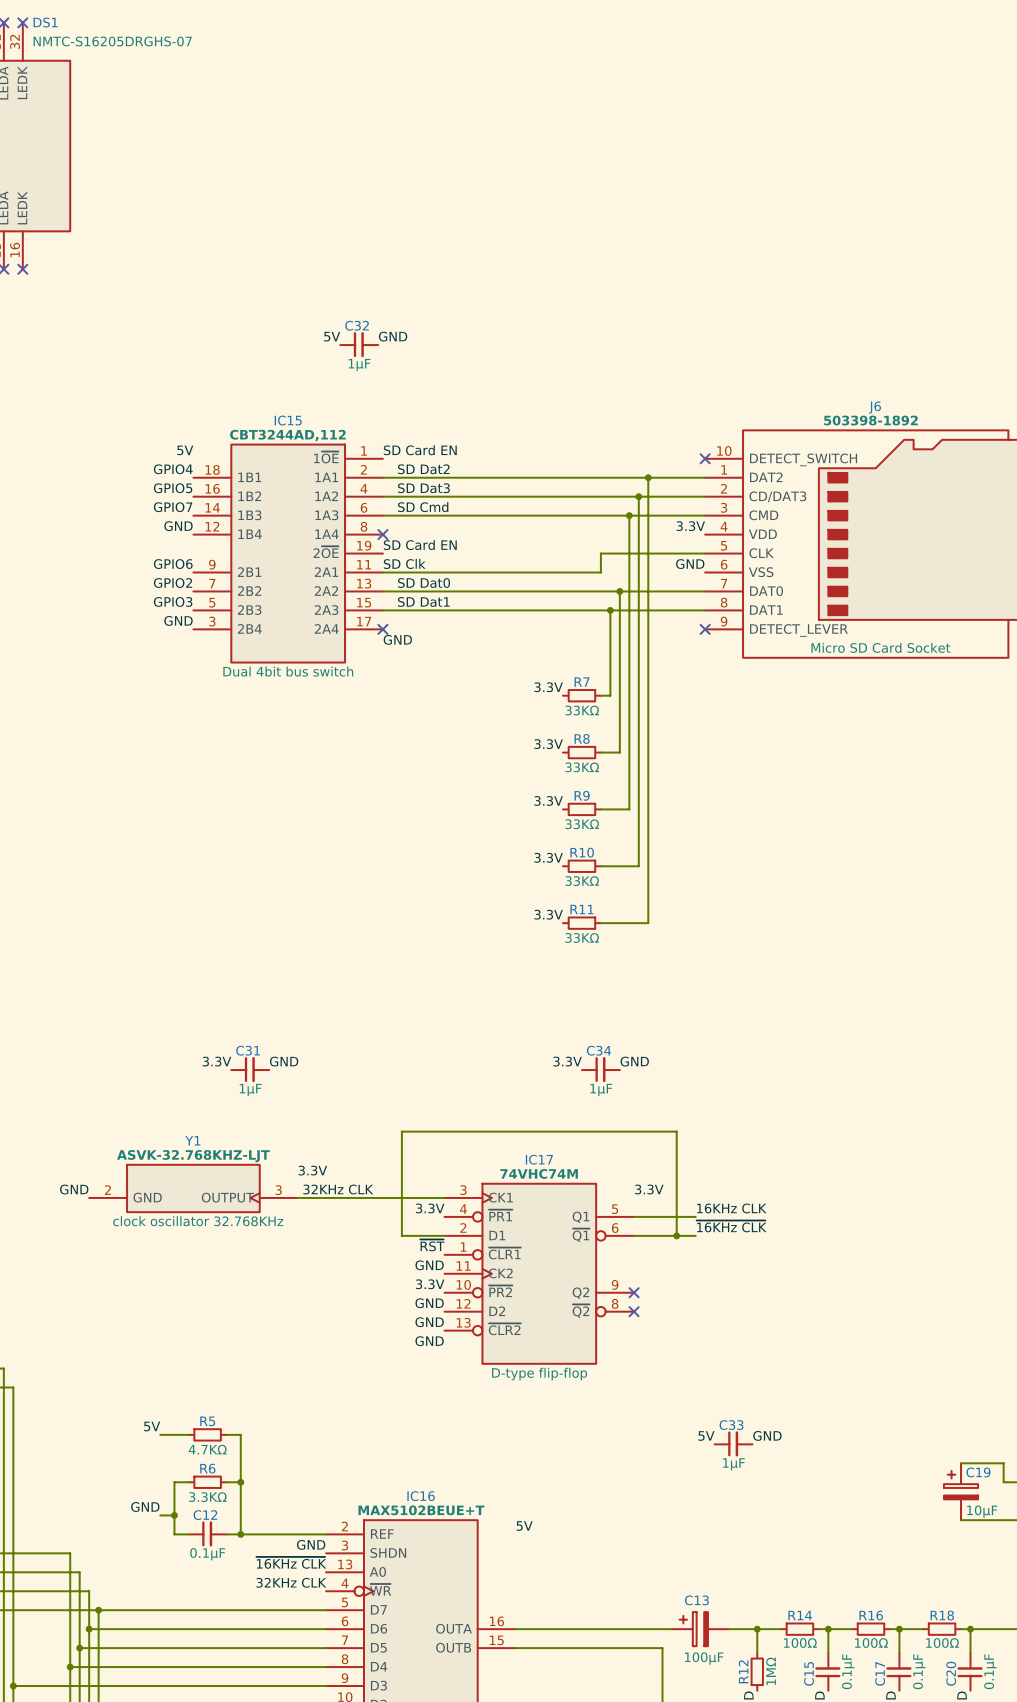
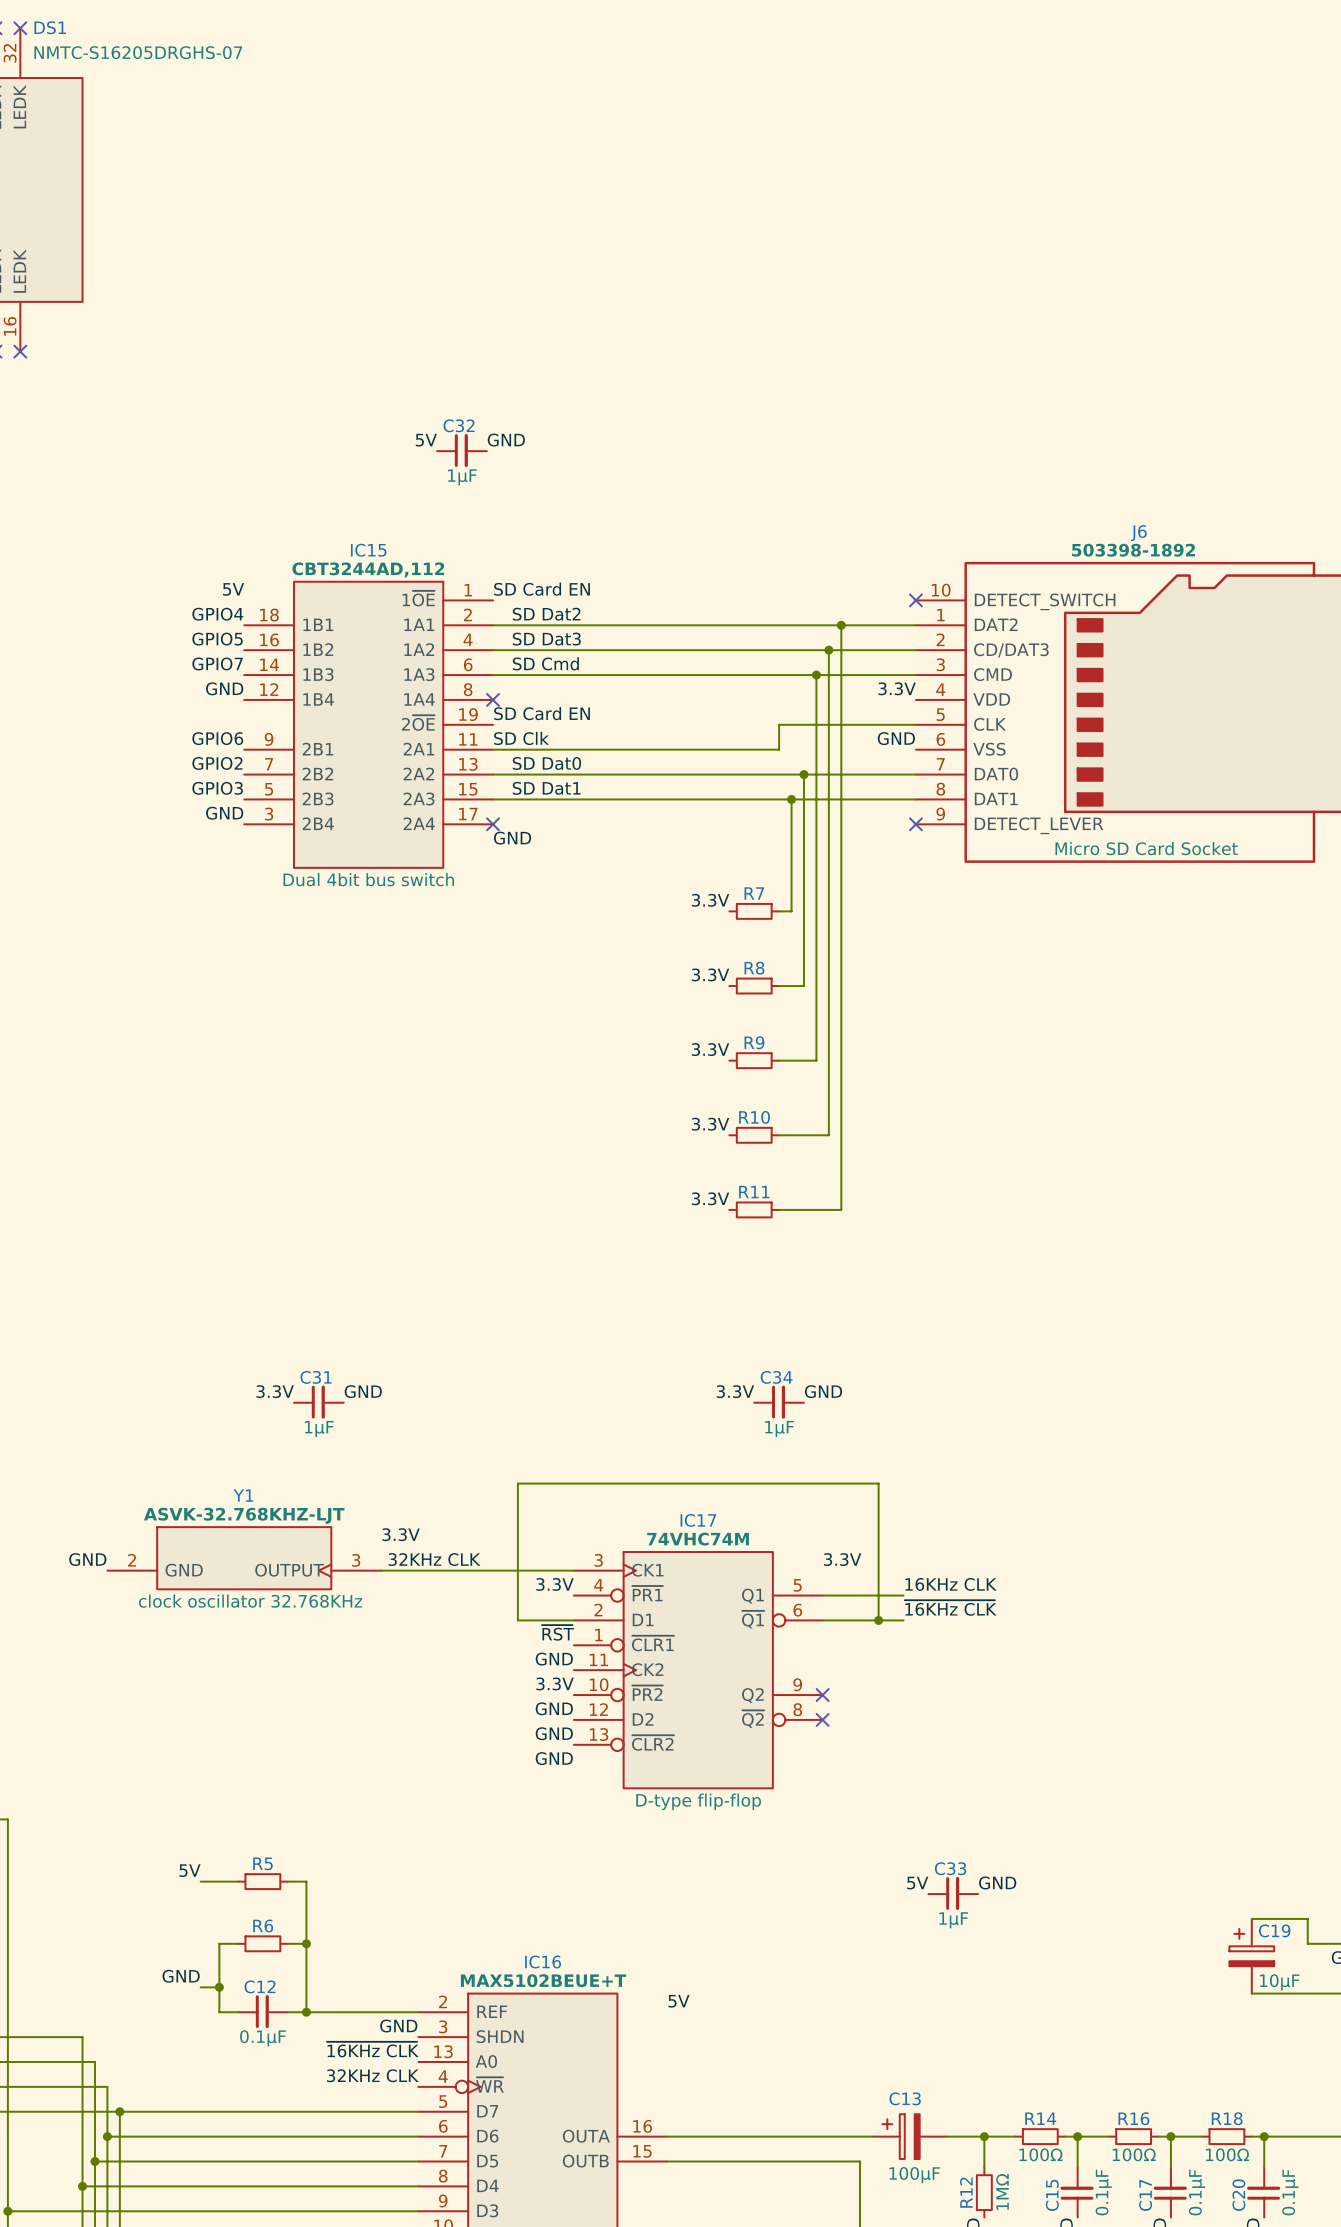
R7 text: 33KΩ (582, 710) -> none
R8 text: 33KΩ (582, 767) -> none
R9 text: 33KΩ (582, 824) -> none
R10 text: 33KΩ (582, 881) -> none
R11 text: 33KΩ (582, 937) -> none
R5 text: 4.7KΩ (207, 1449) -> none
R6 text: 3.3KΩ (207, 1497) -> none

